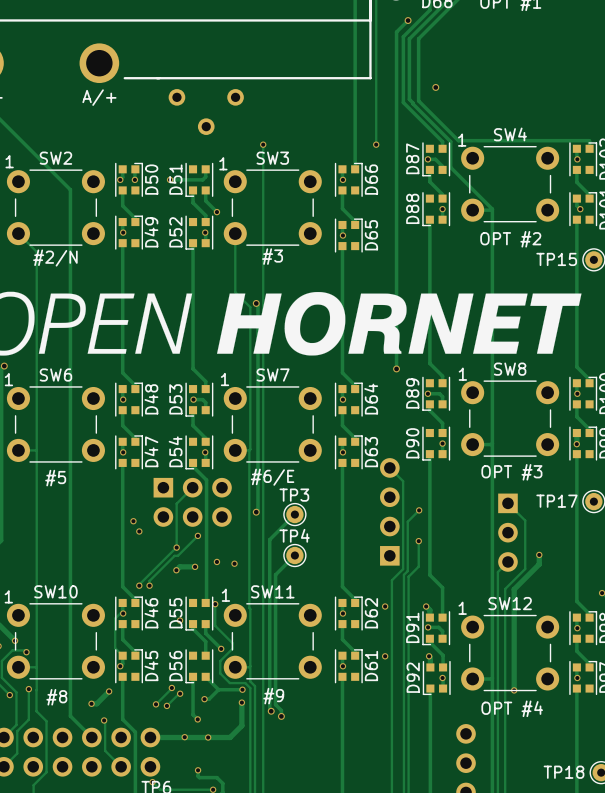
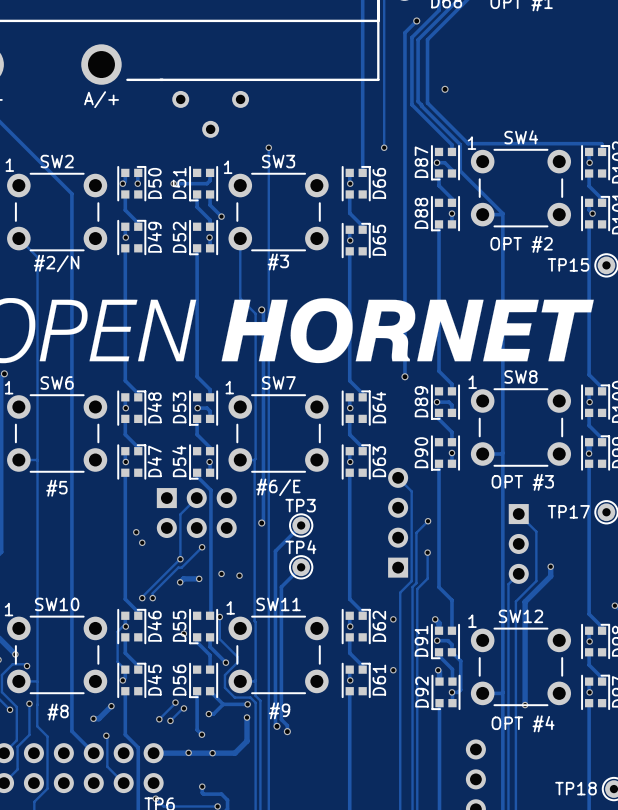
track: none -> (451, 652) (460, 661) (460, 689) (458, 692) (451, 692)

